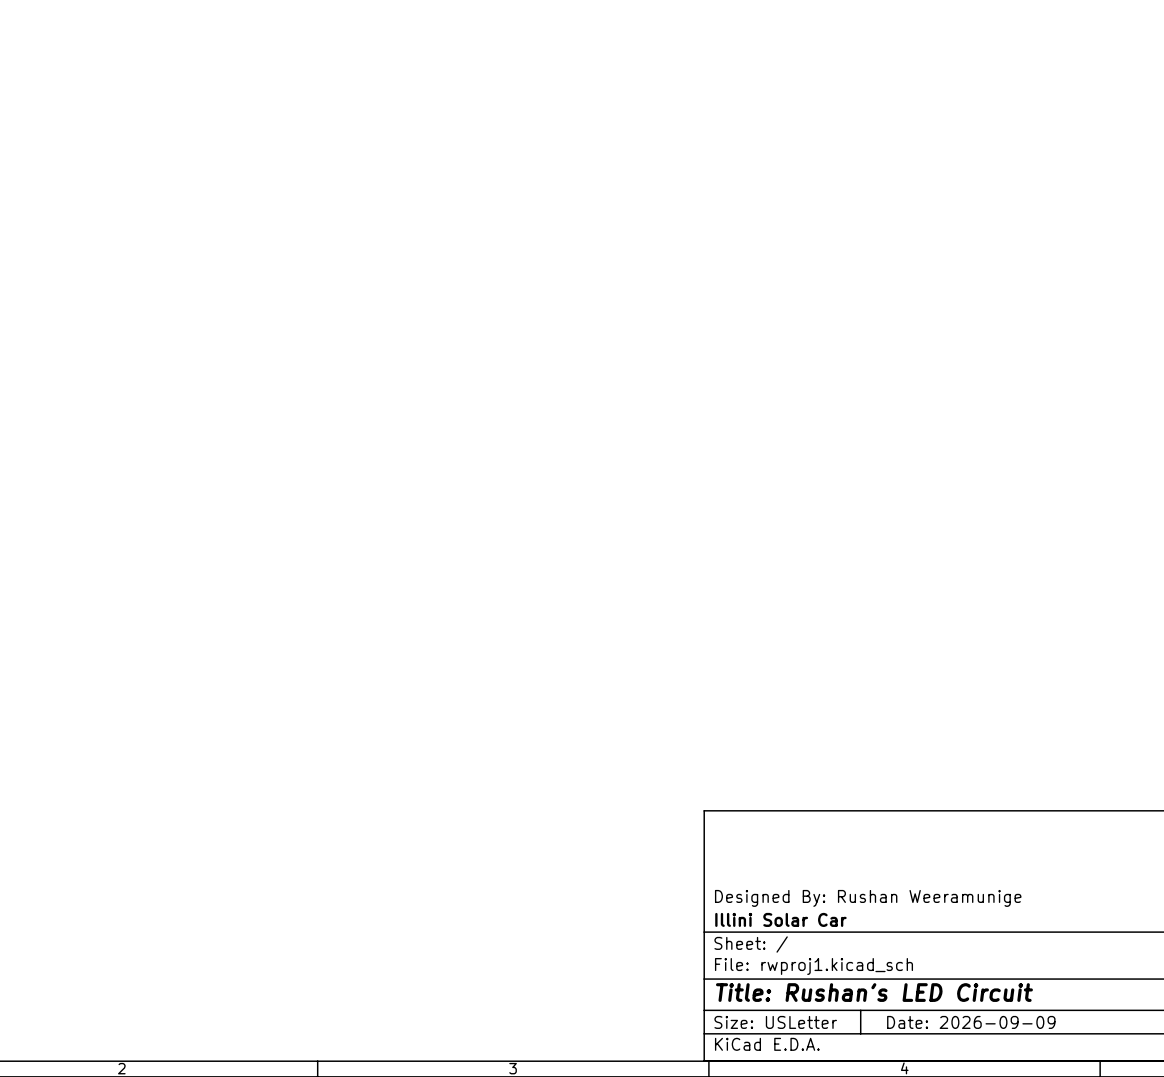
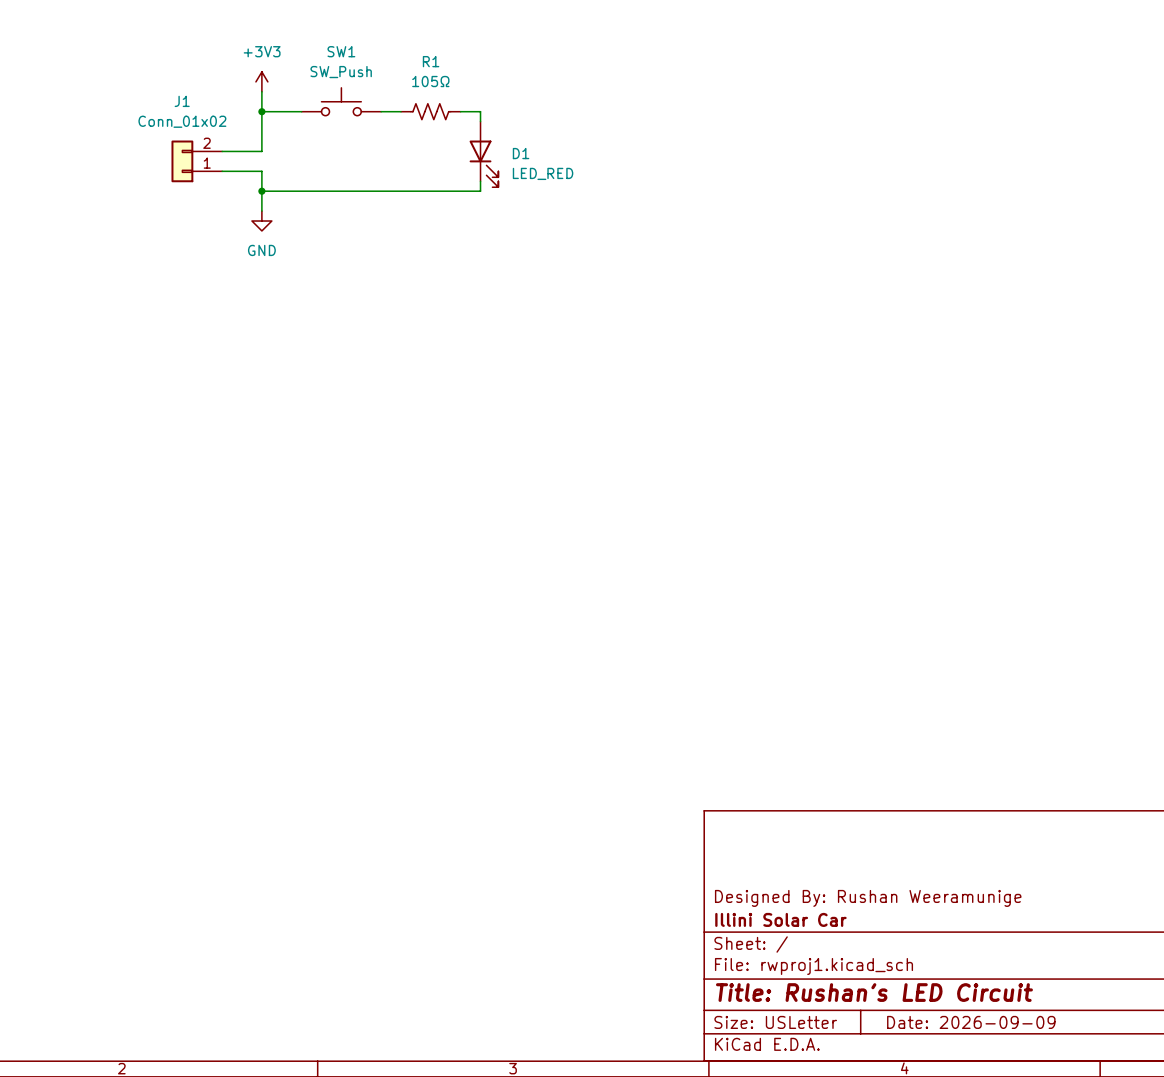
power symbol: none -> +3V3 (261, 81)
wire: none -> (261, 91) (261, 151) (222, 151)
SW1: none -> SW_Push (341, 101)
wire: none -> (261, 111) (301, 111)
junction: none -> (261, 111)
wire: none -> (381, 111) (401, 111)
R1: none -> 105Ω (430, 111)
wire: none -> (460, 111) (480, 111) (480, 121)
D1: none -> LED_RED (483, 154)
J1: none -> Conn_01x02 (196, 161)
wire: none -> (222, 171) (261, 171) (261, 211)
wire: none -> (480, 181) (480, 191) (261, 191)
junction: none -> (261, 191)
power symbol: none -> GND (261, 221)

